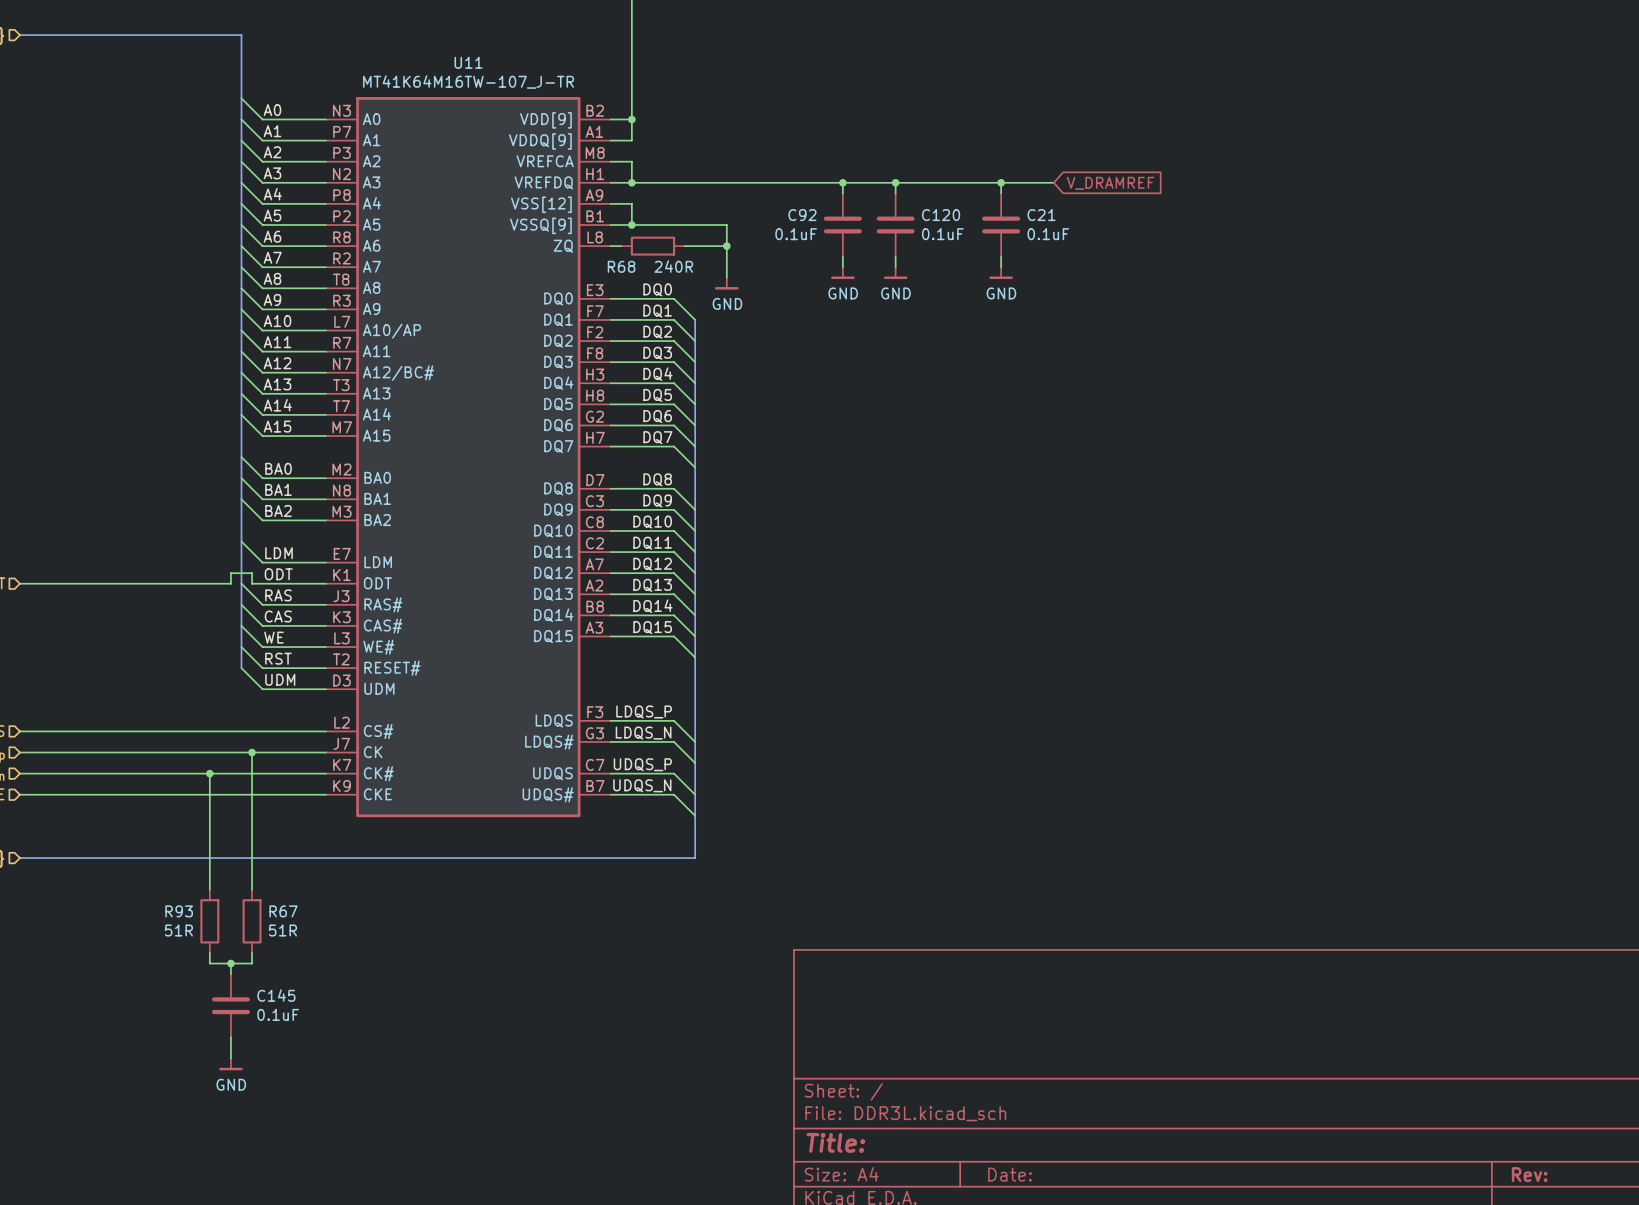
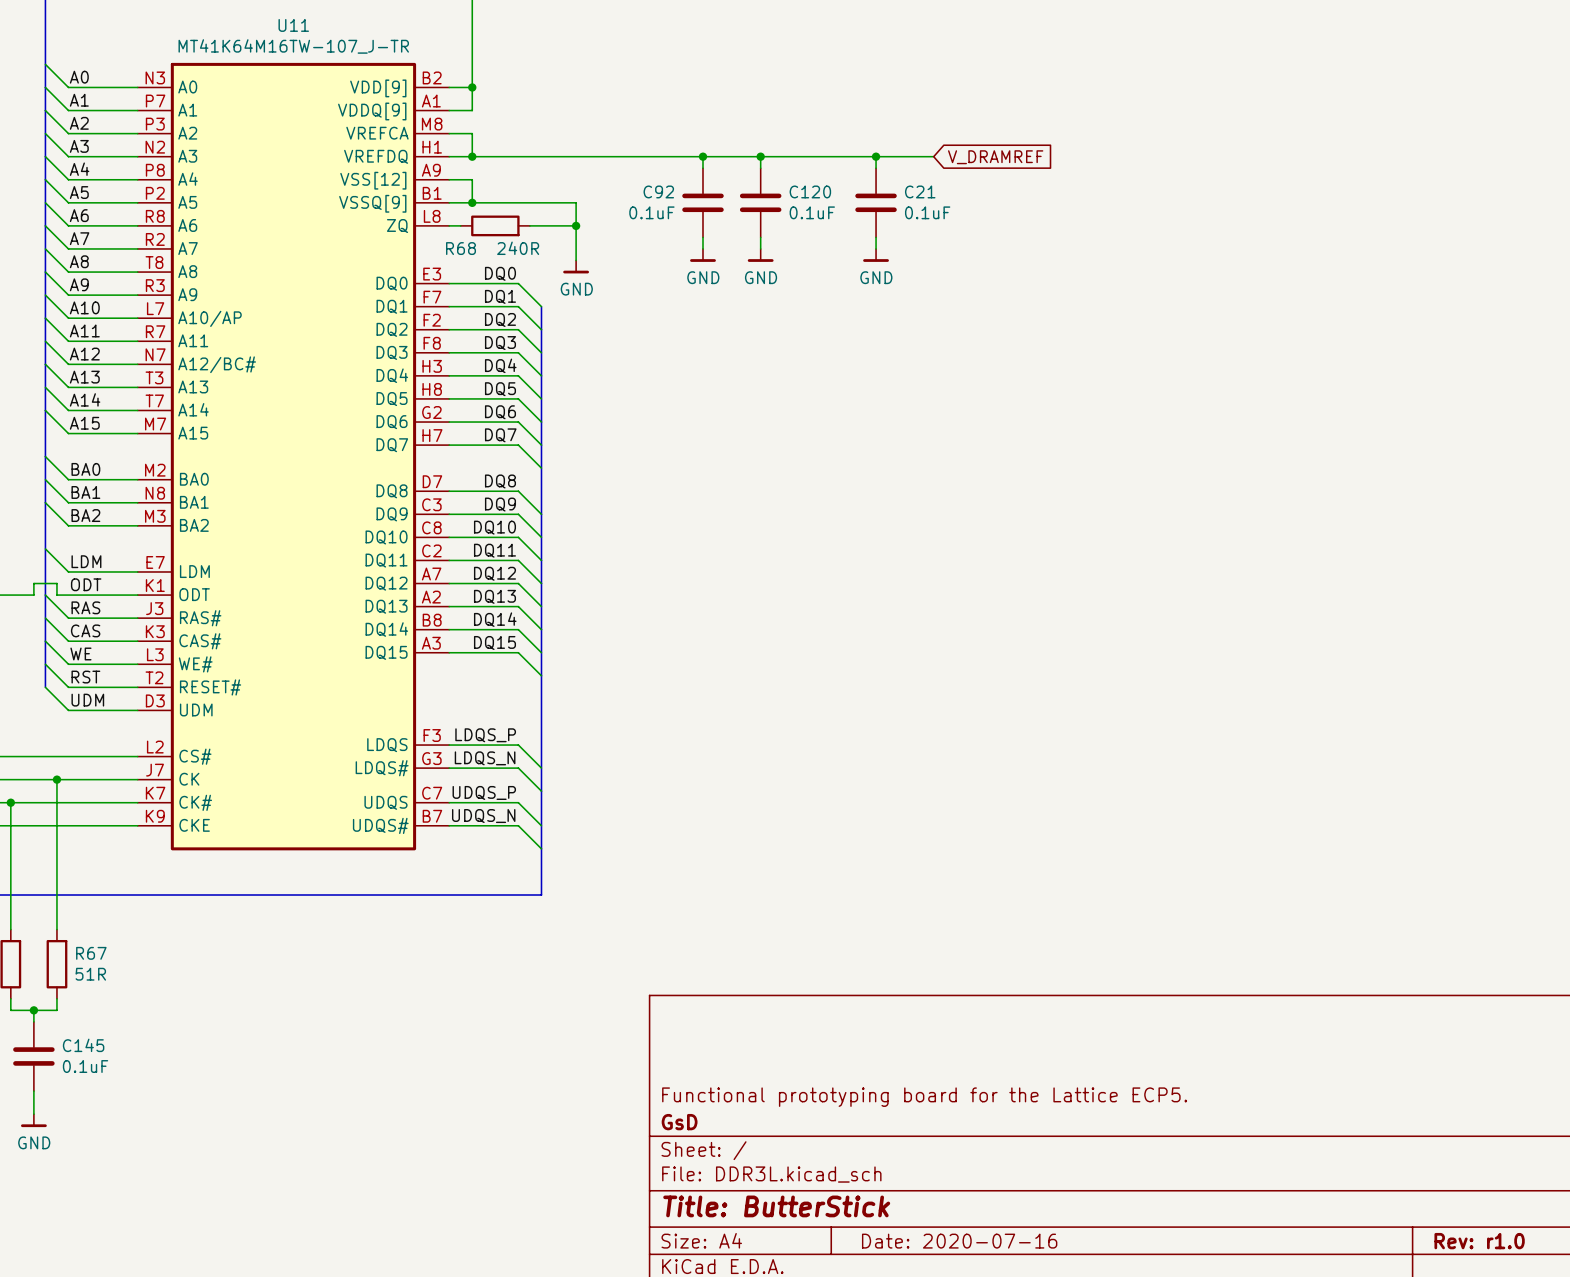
title block: none -> Functional prototyping board for the Lattice ECP5. (924, 1097)
title block: none -> GsD (679, 1122)
title block: Title: (835, 1142) -> Title: ButterStick (776, 1206)
title block: Date: (1009, 1174) -> Date: 2020-07-16 (959, 1241)
title block: Rev: (1529, 1174) -> Rev: r1.0 (1479, 1241)

